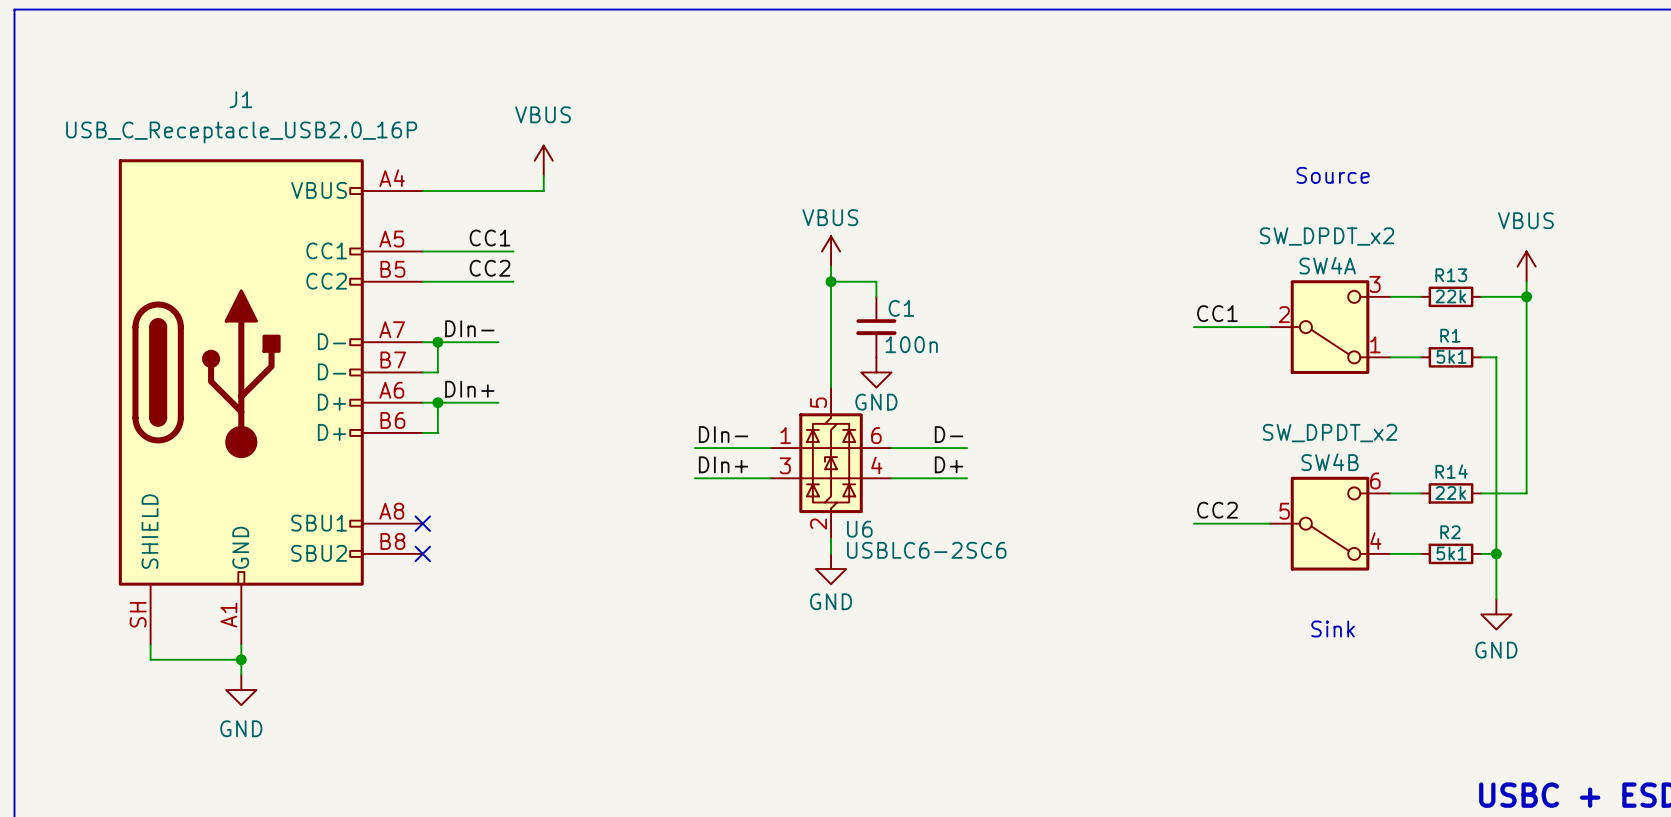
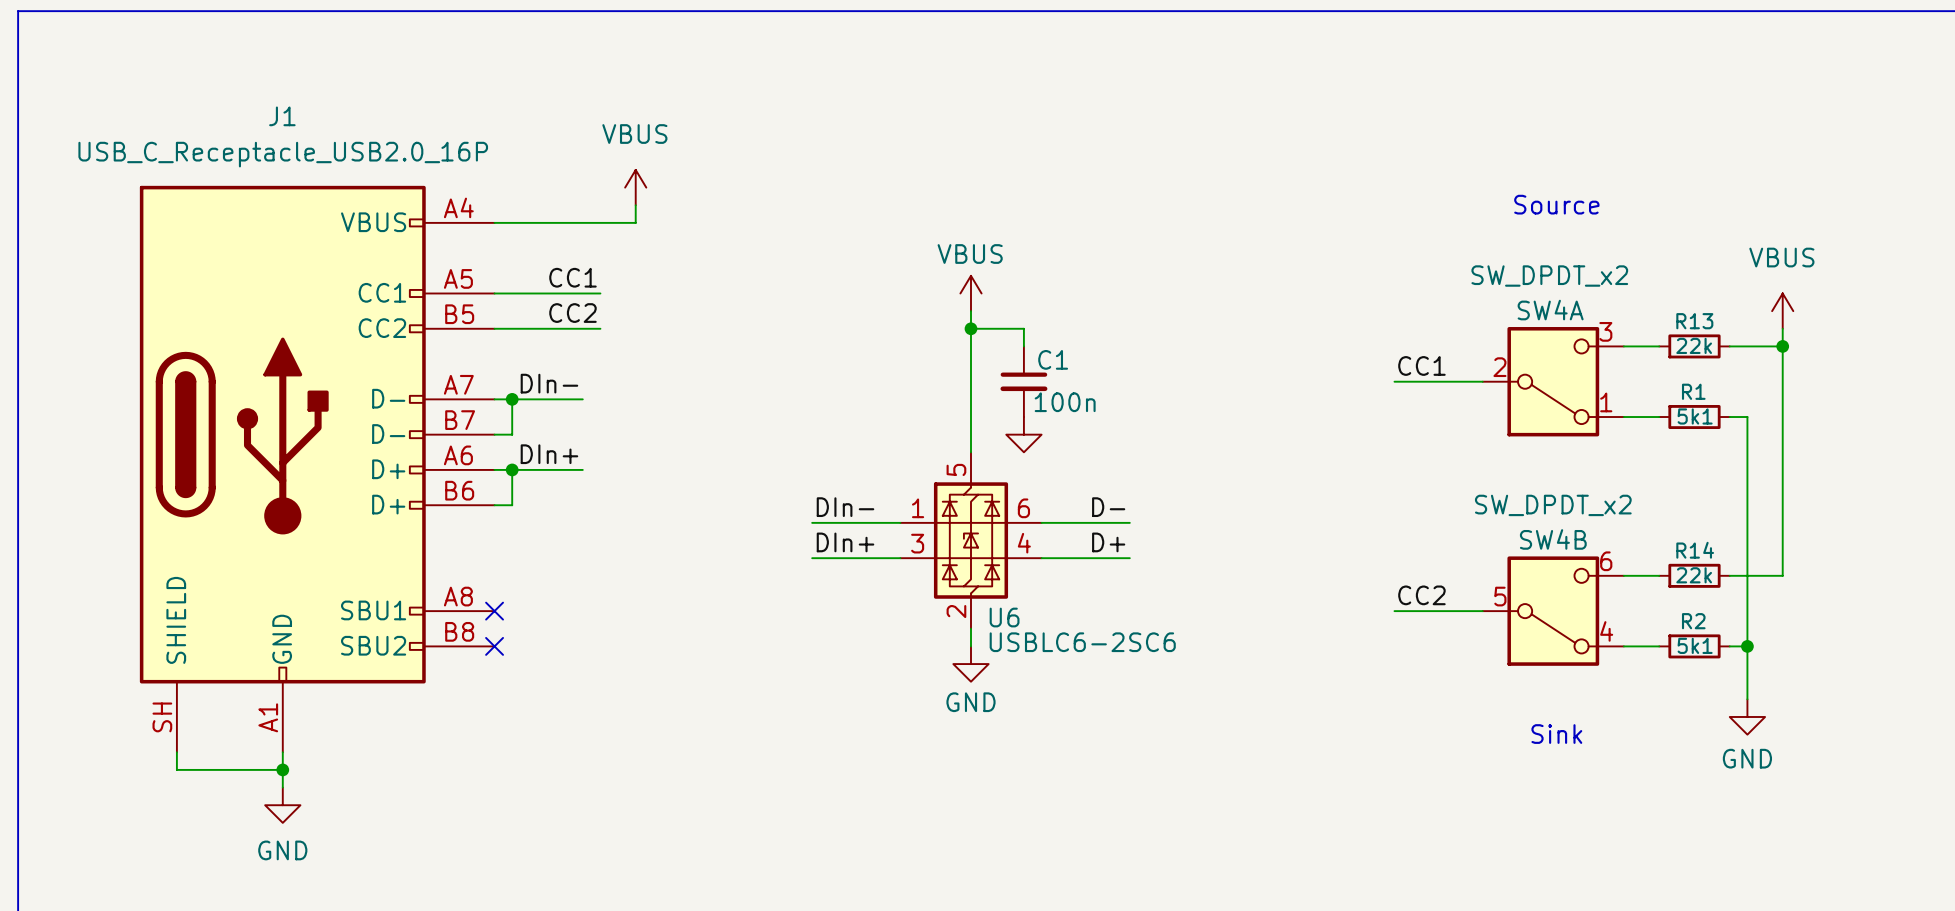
power symbol text: GND (876, 402) -> none

